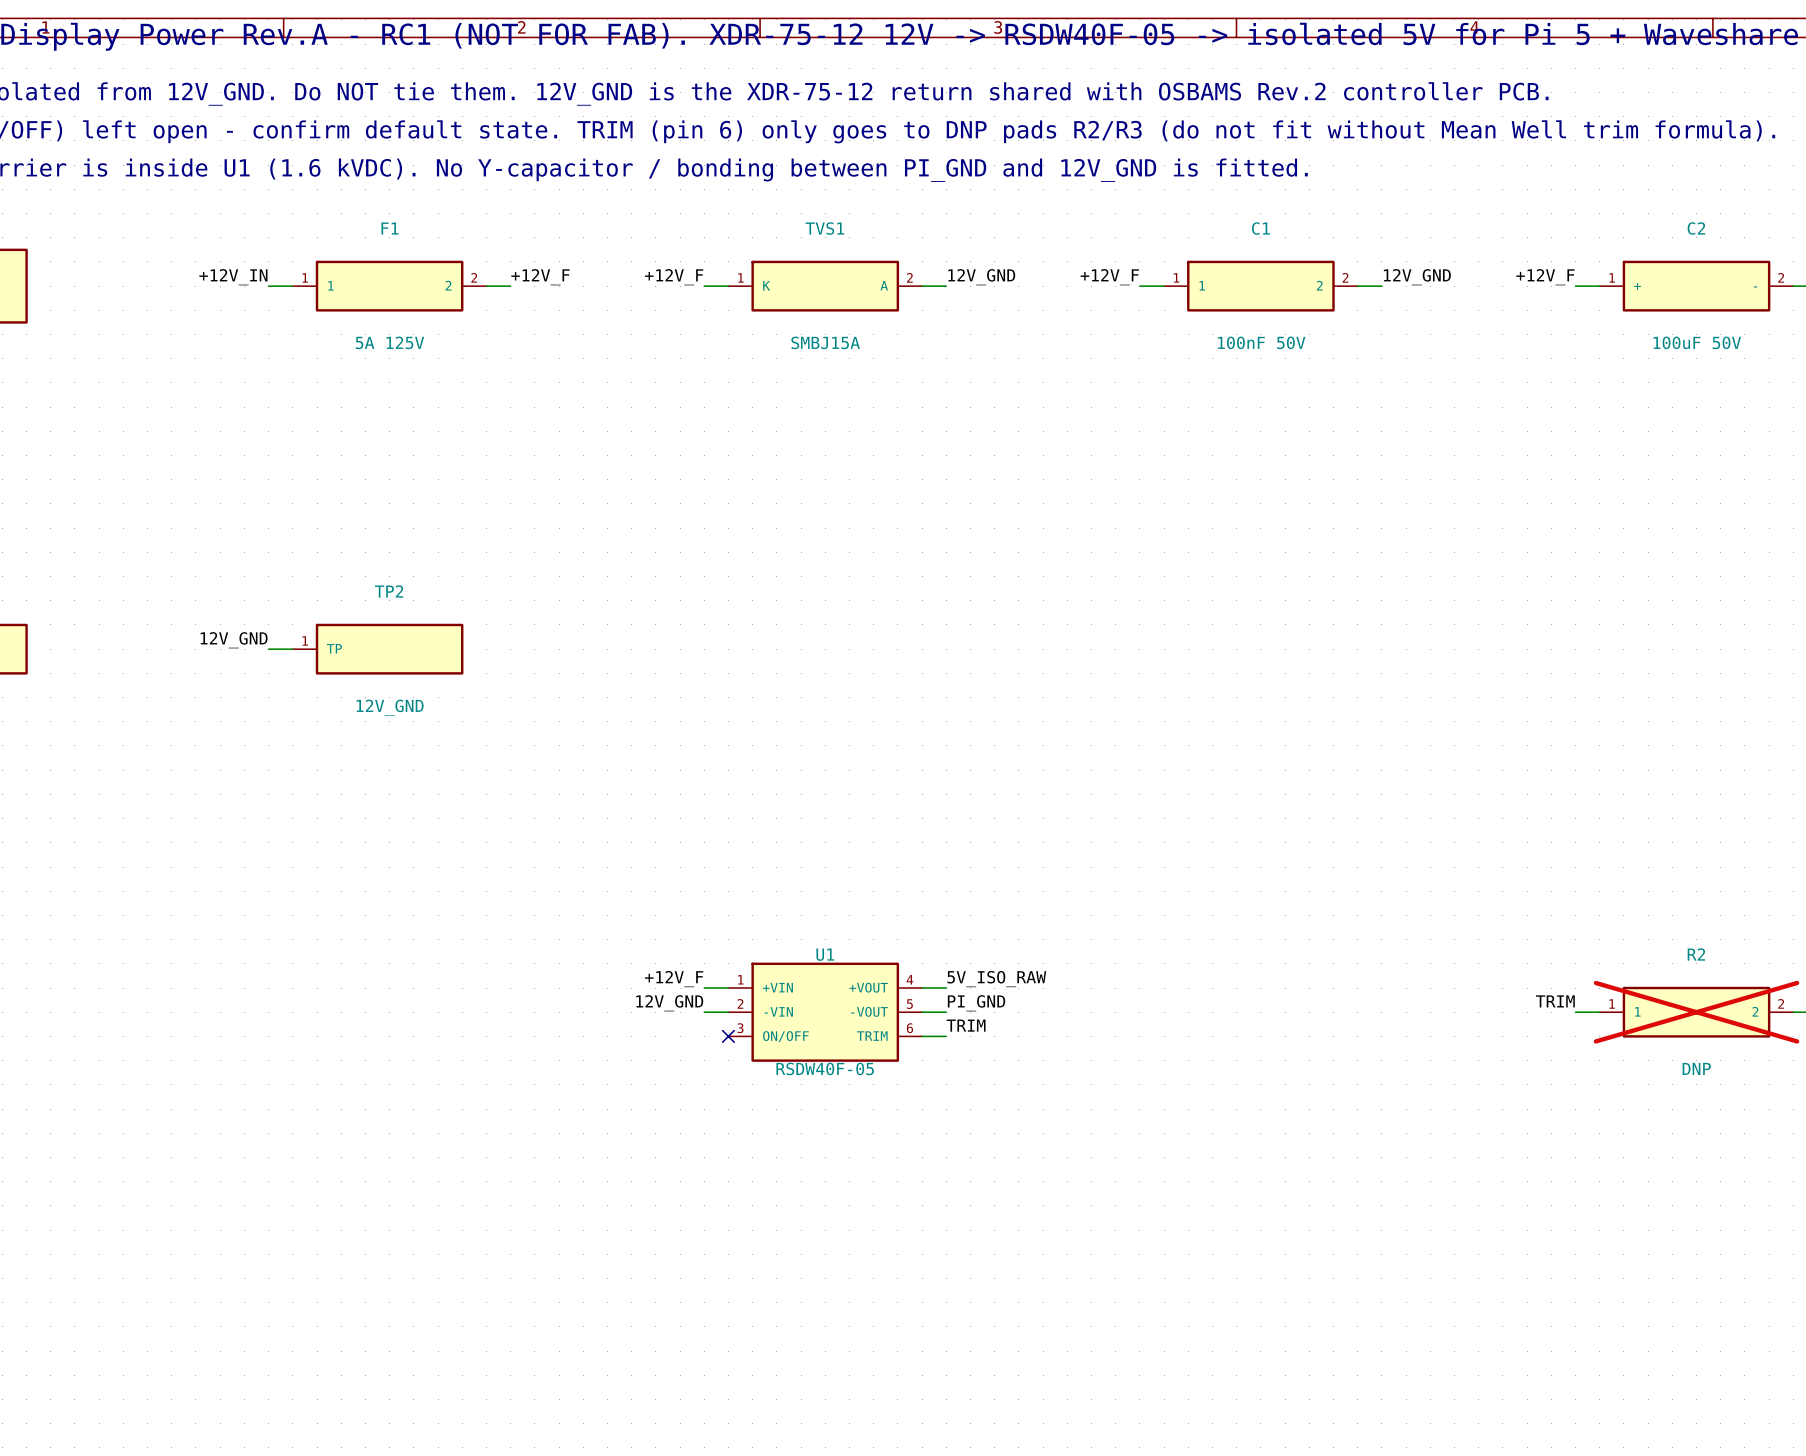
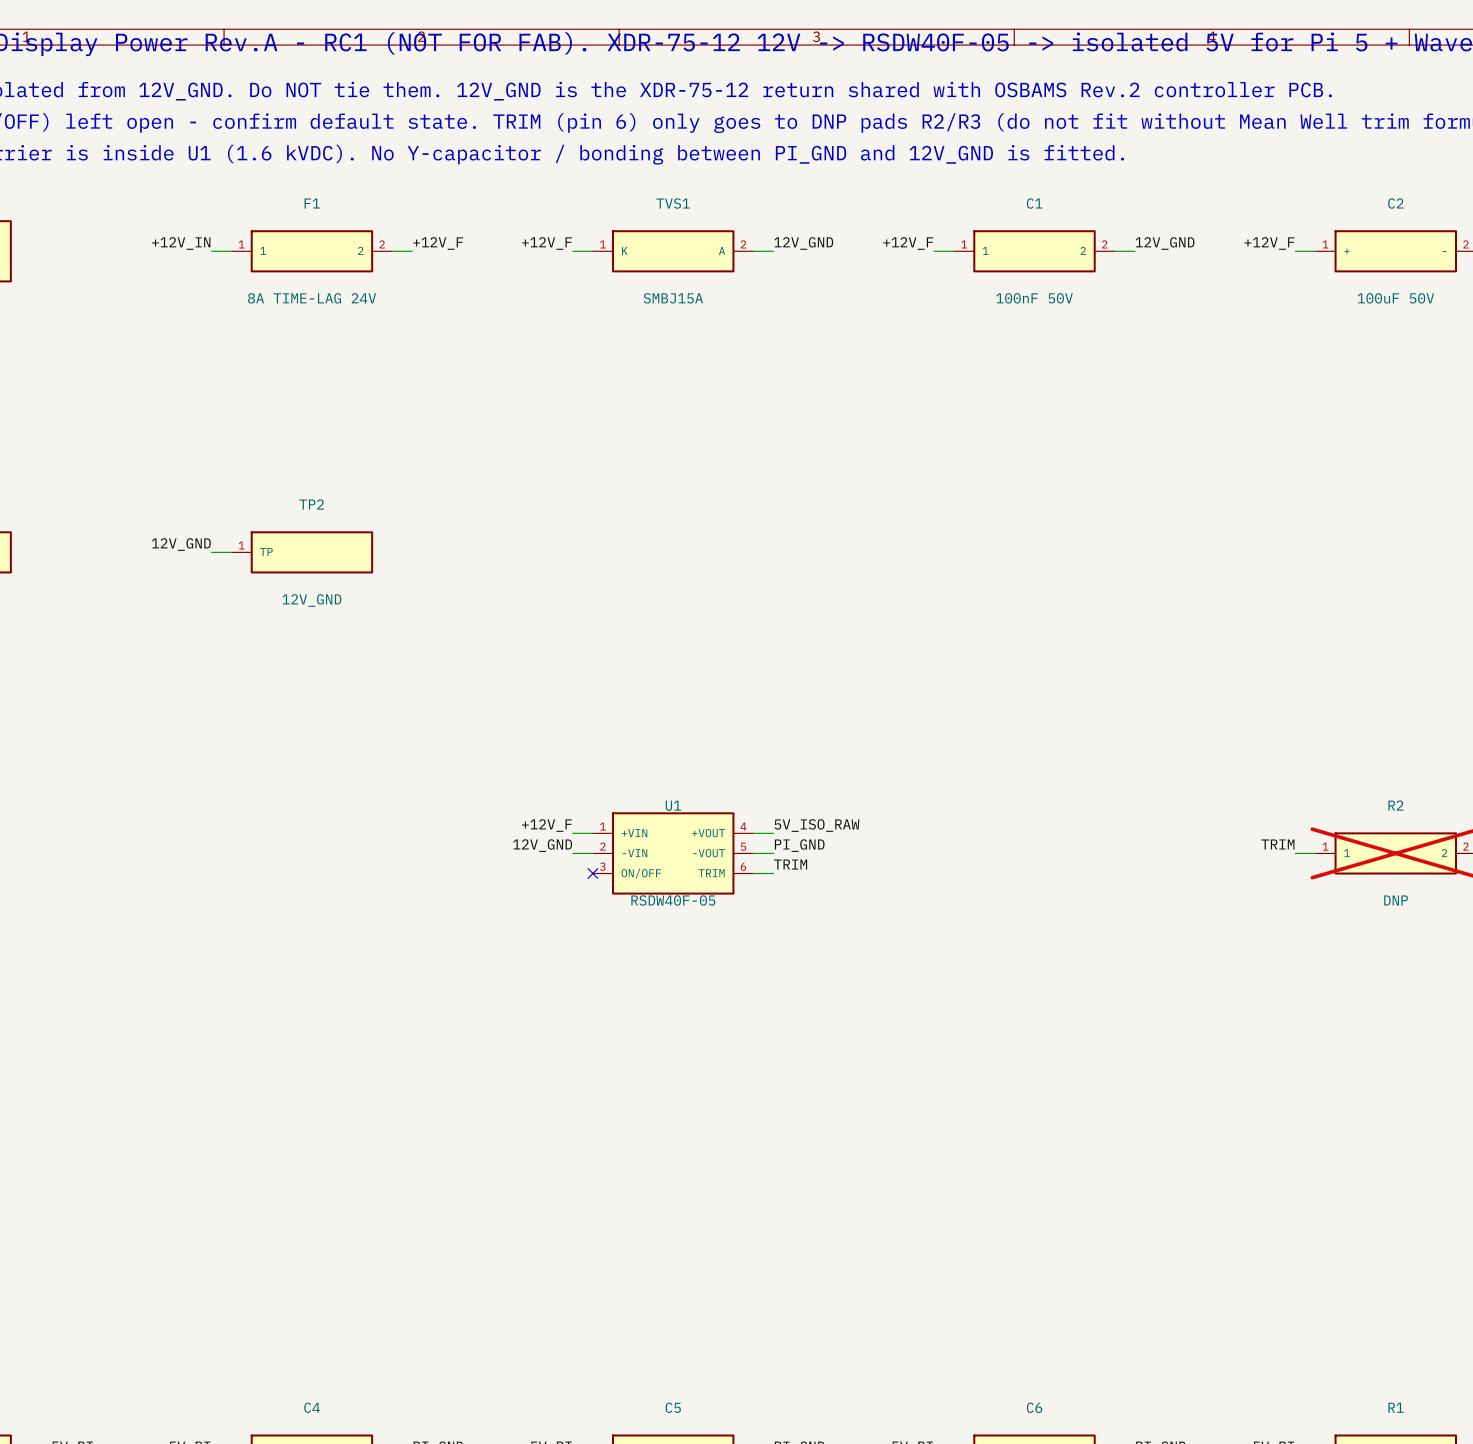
F1 value: 5A 125V (389, 342) -> 8A TIME-LAG 24V (312, 298)

